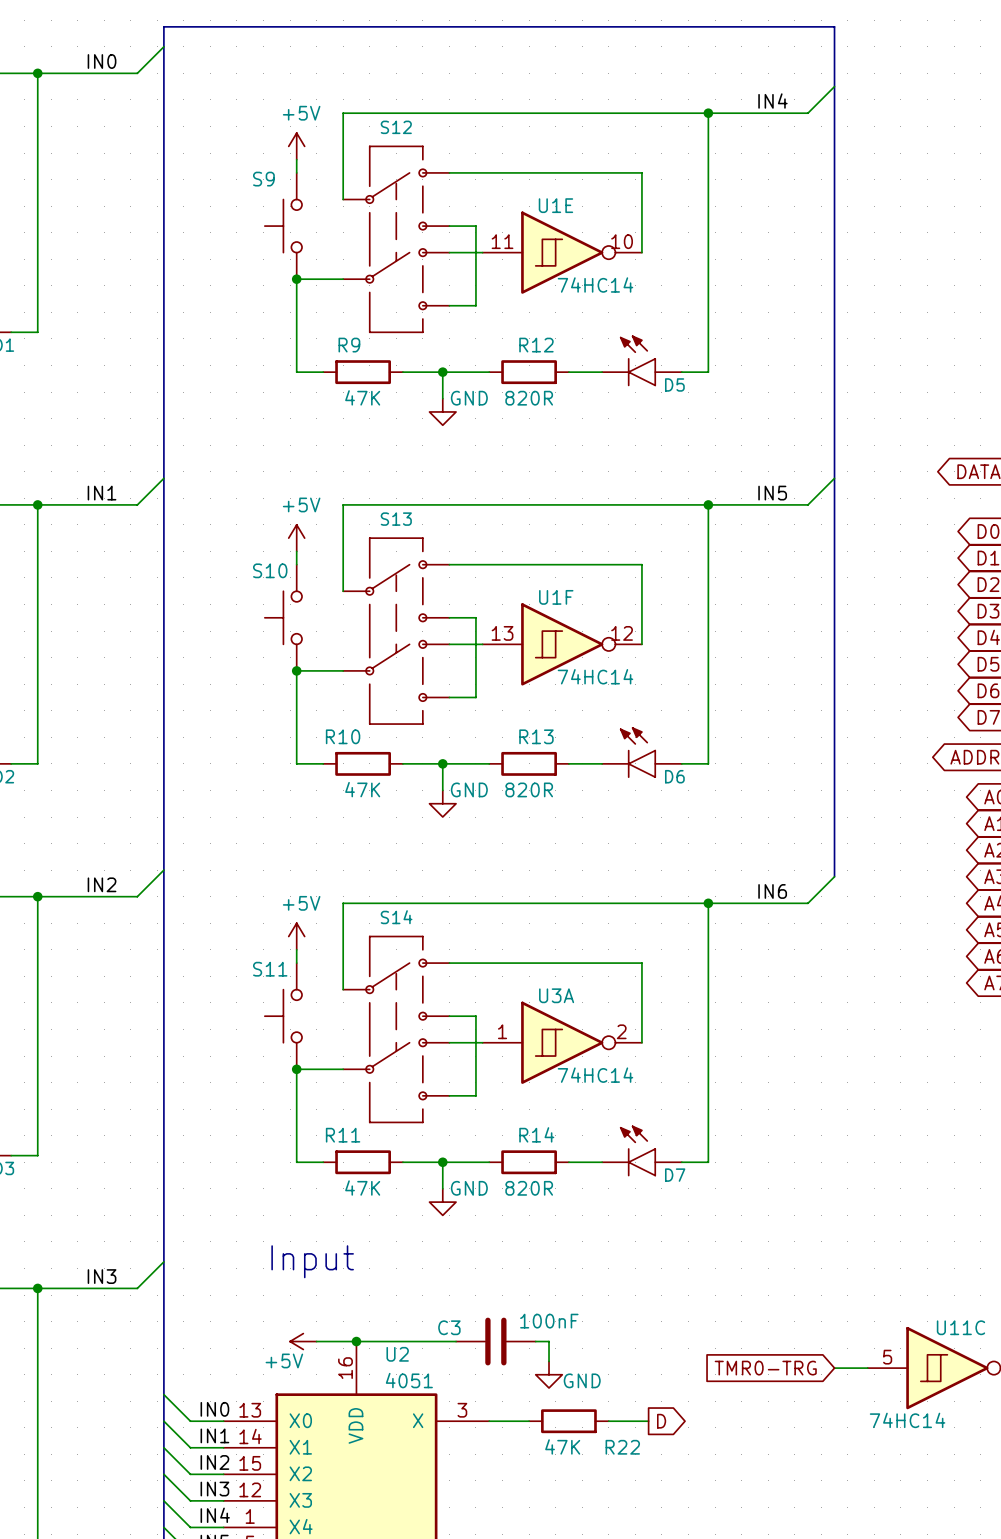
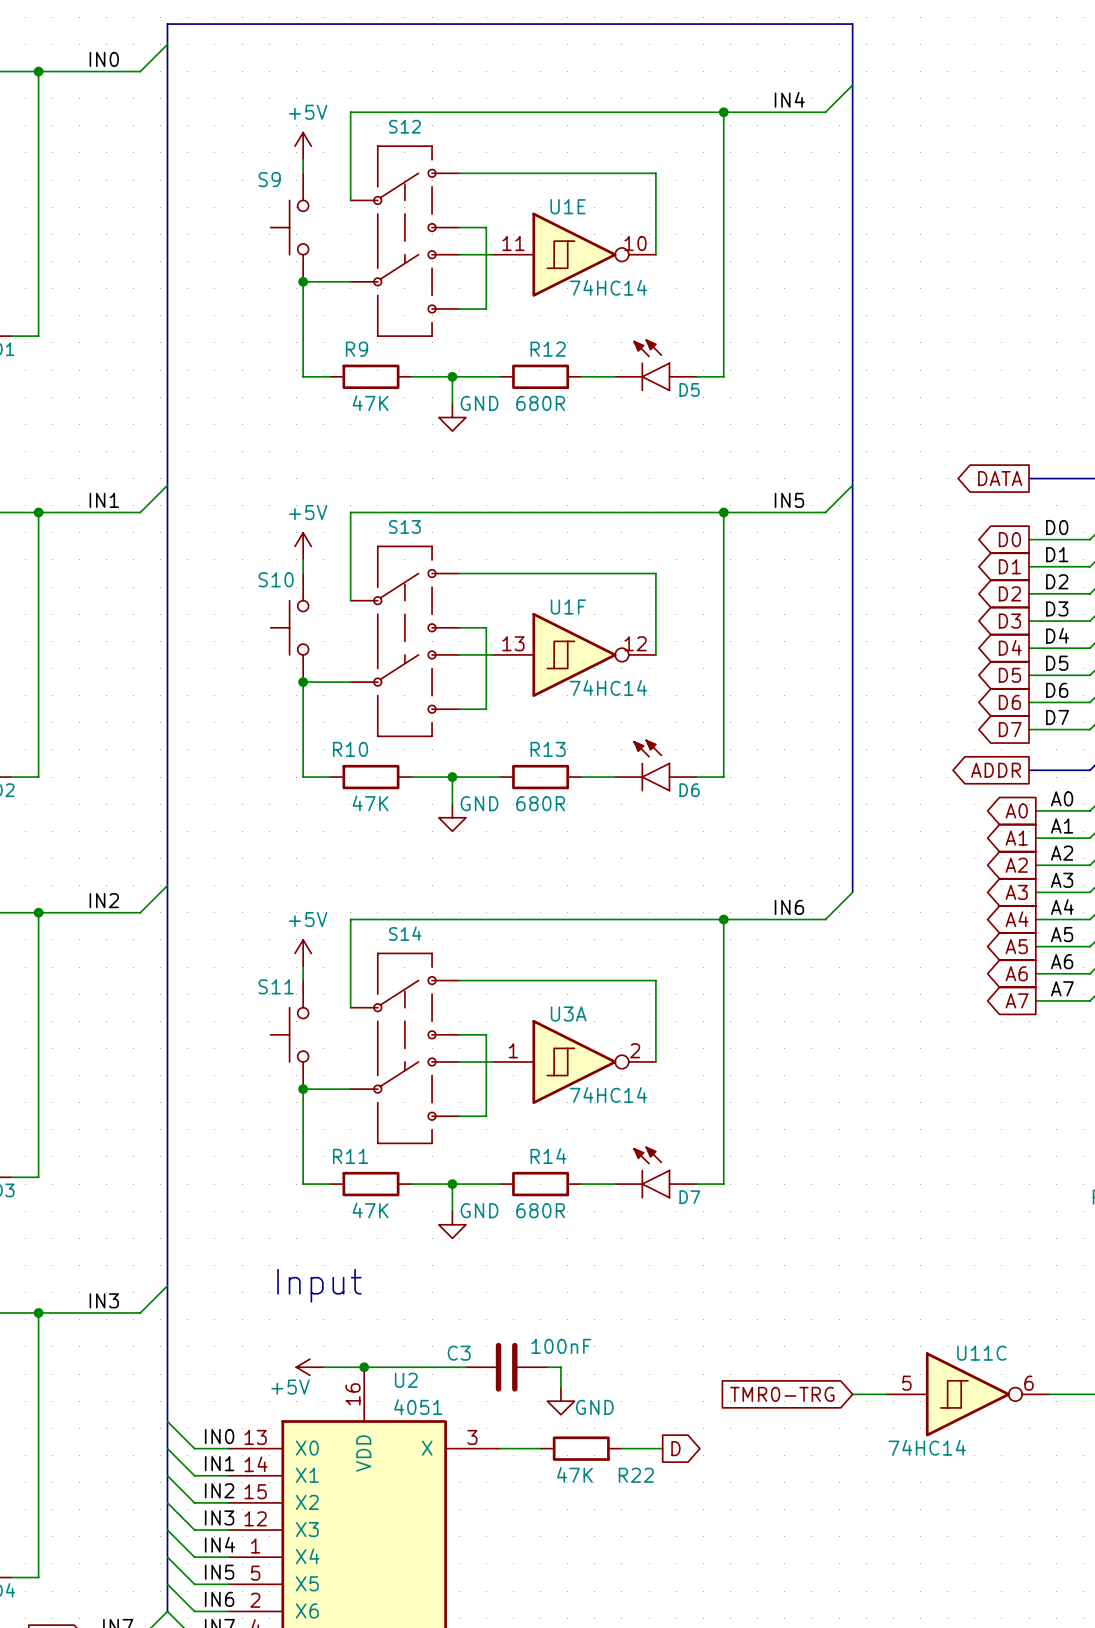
R12 value: 820R (529, 398) -> 680R (540, 403)
R13 value: 820R (529, 789) -> 680R (540, 803)
R14 value: 820R (529, 1188) -> 680R (540, 1210)

